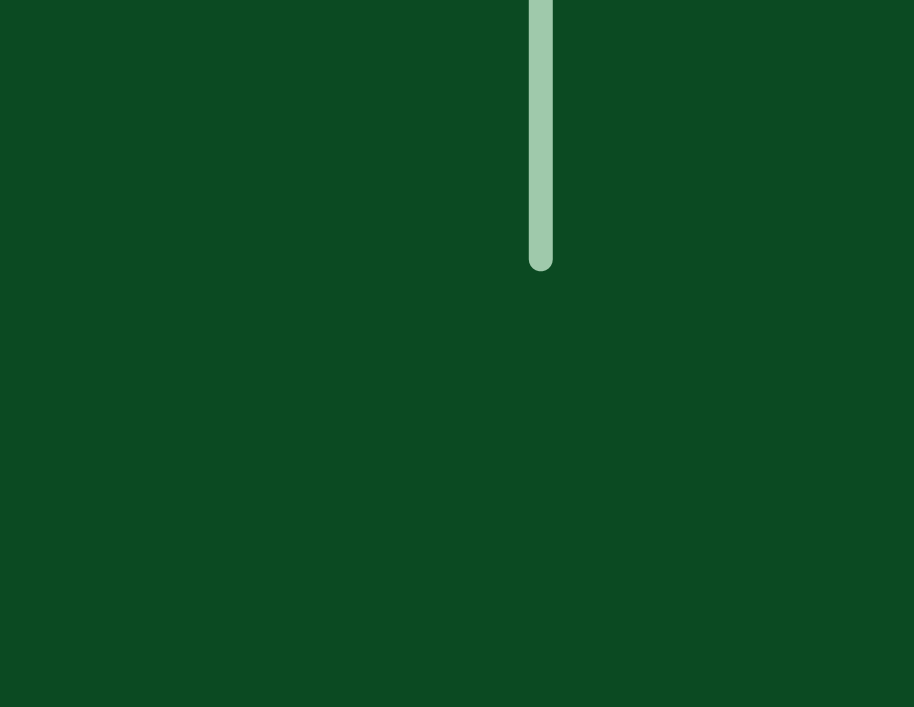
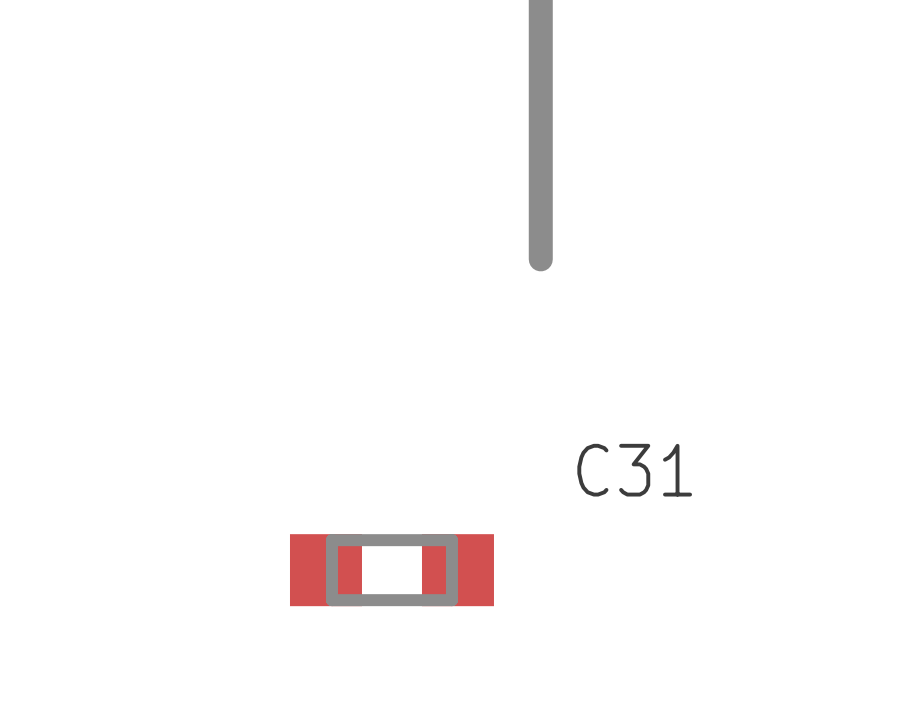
C31: none -> (391, 570)

